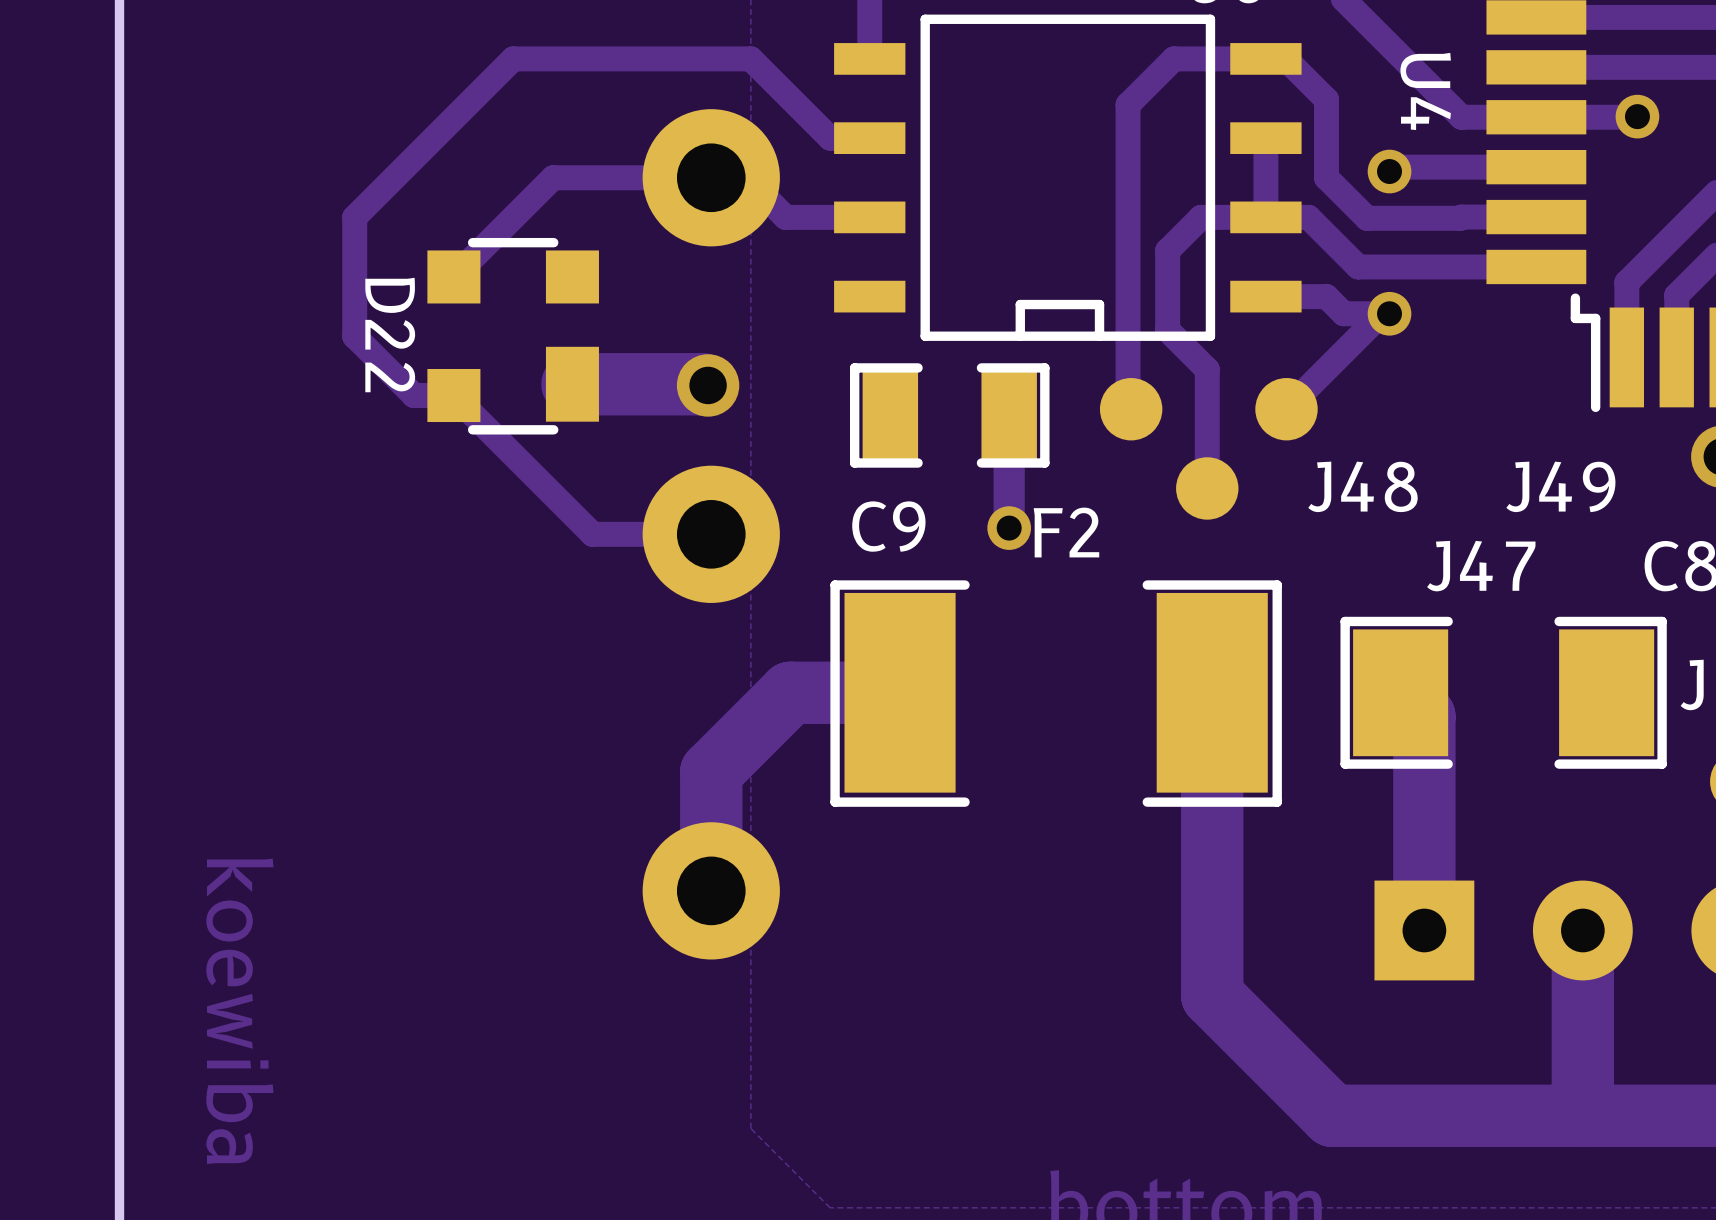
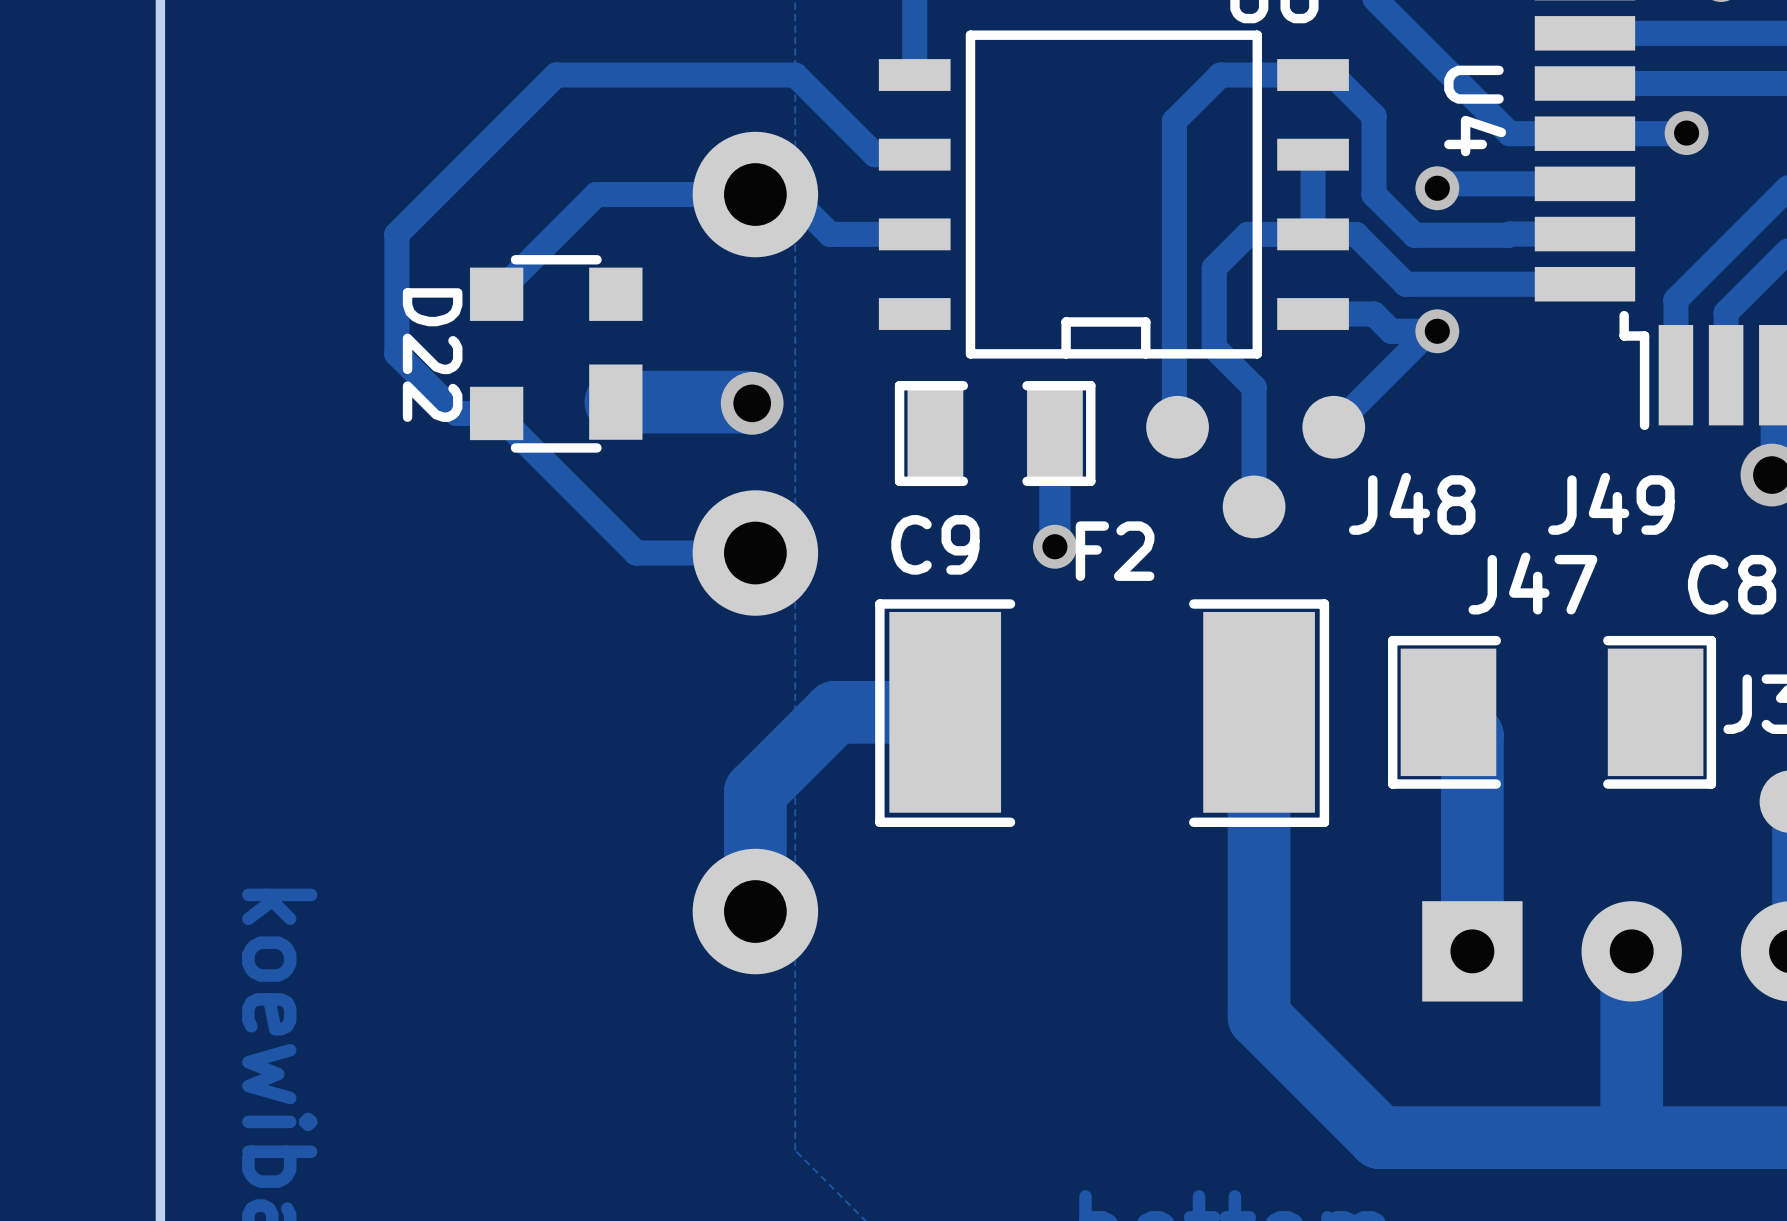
part footprint: [642, 109, 780, 247] -> [692, 131, 819, 258]
part footprint: [642, 465, 780, 603] -> [692, 490, 819, 616]
part footprint: [642, 822, 780, 960] -> [692, 848, 819, 975]

